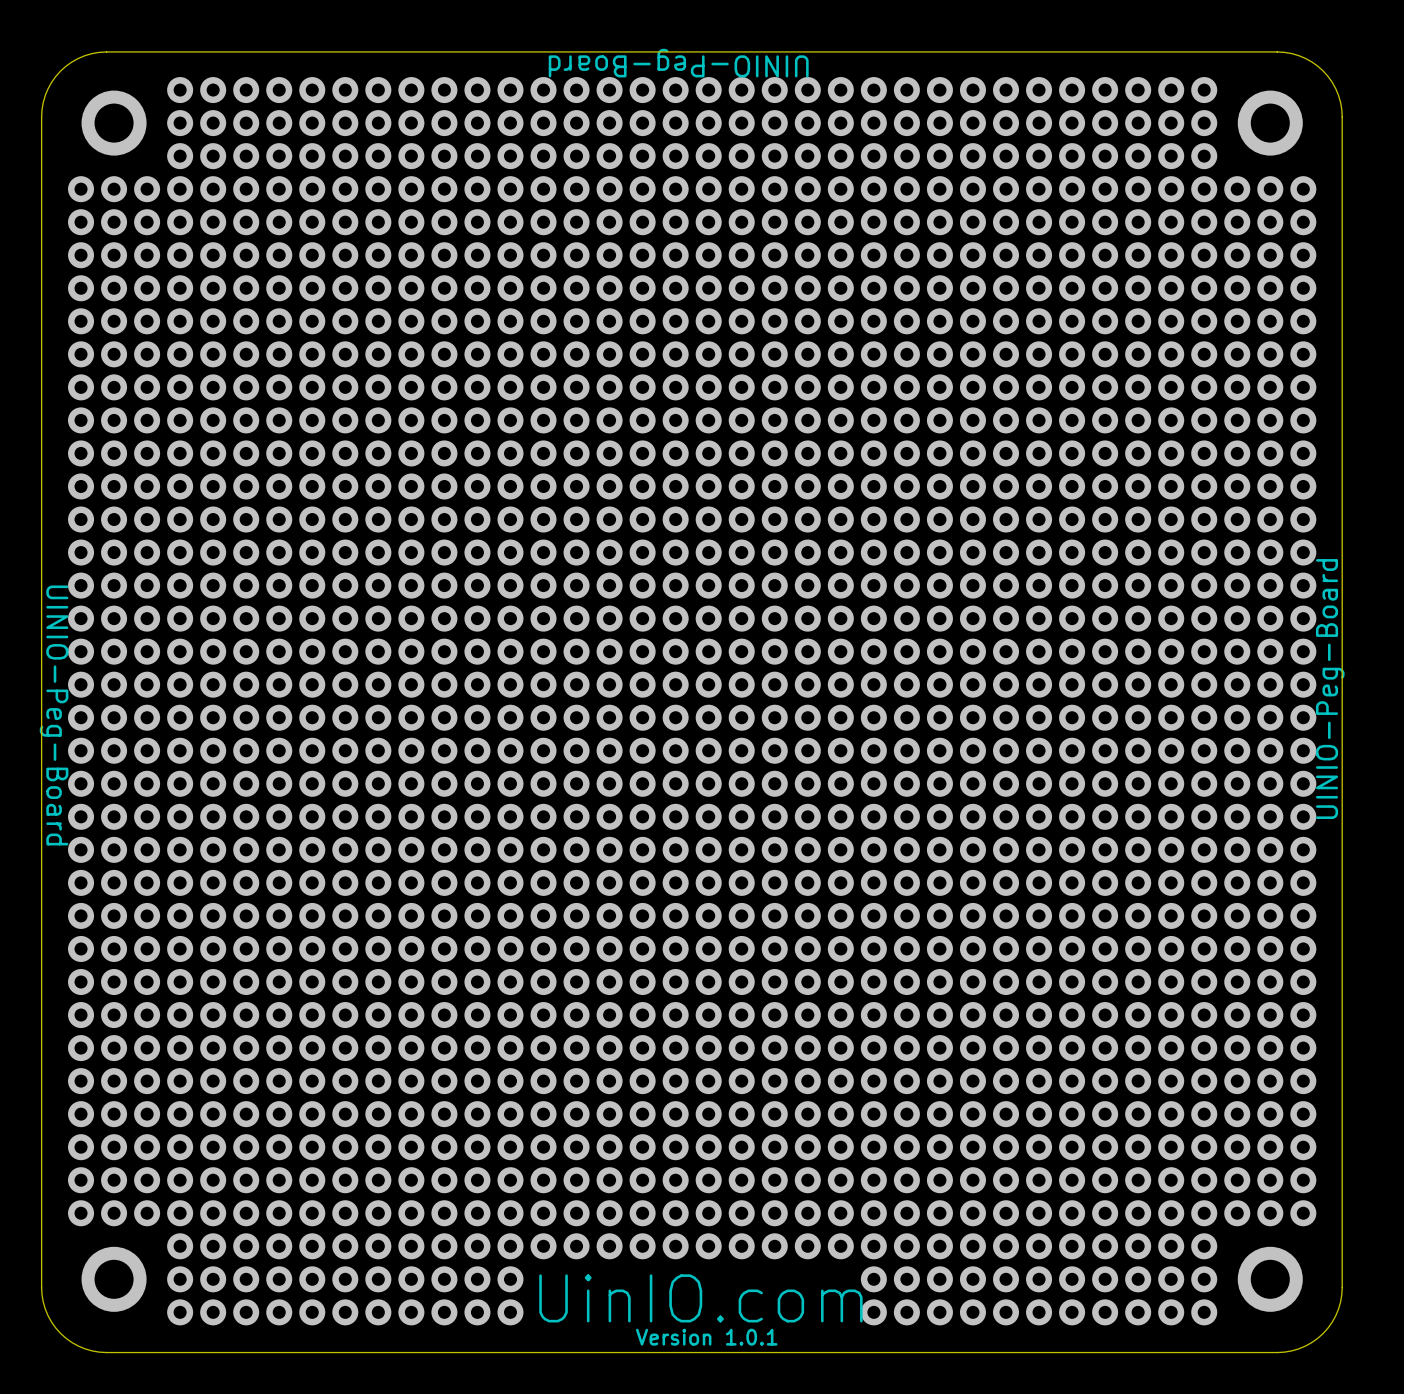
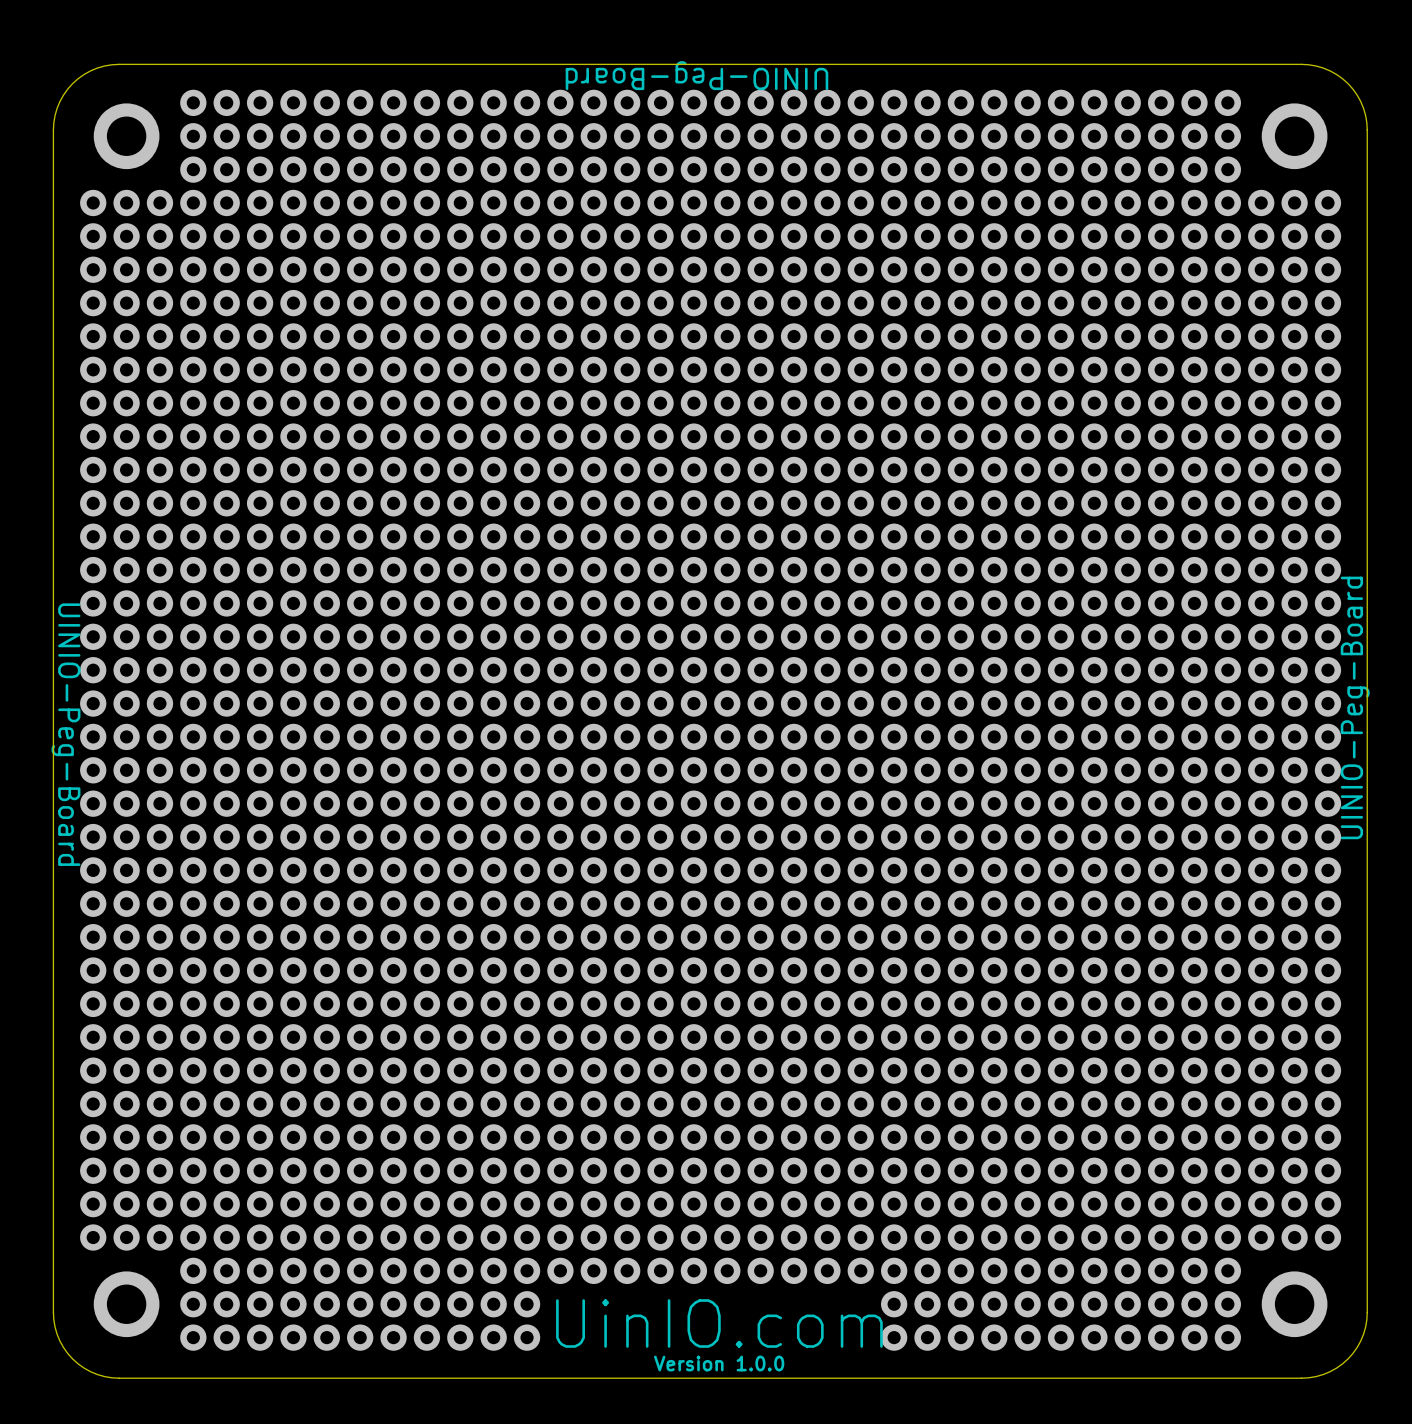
text: Version 1.0.1 (706, 1337) -> Version 1.0.0 (719, 1363)

